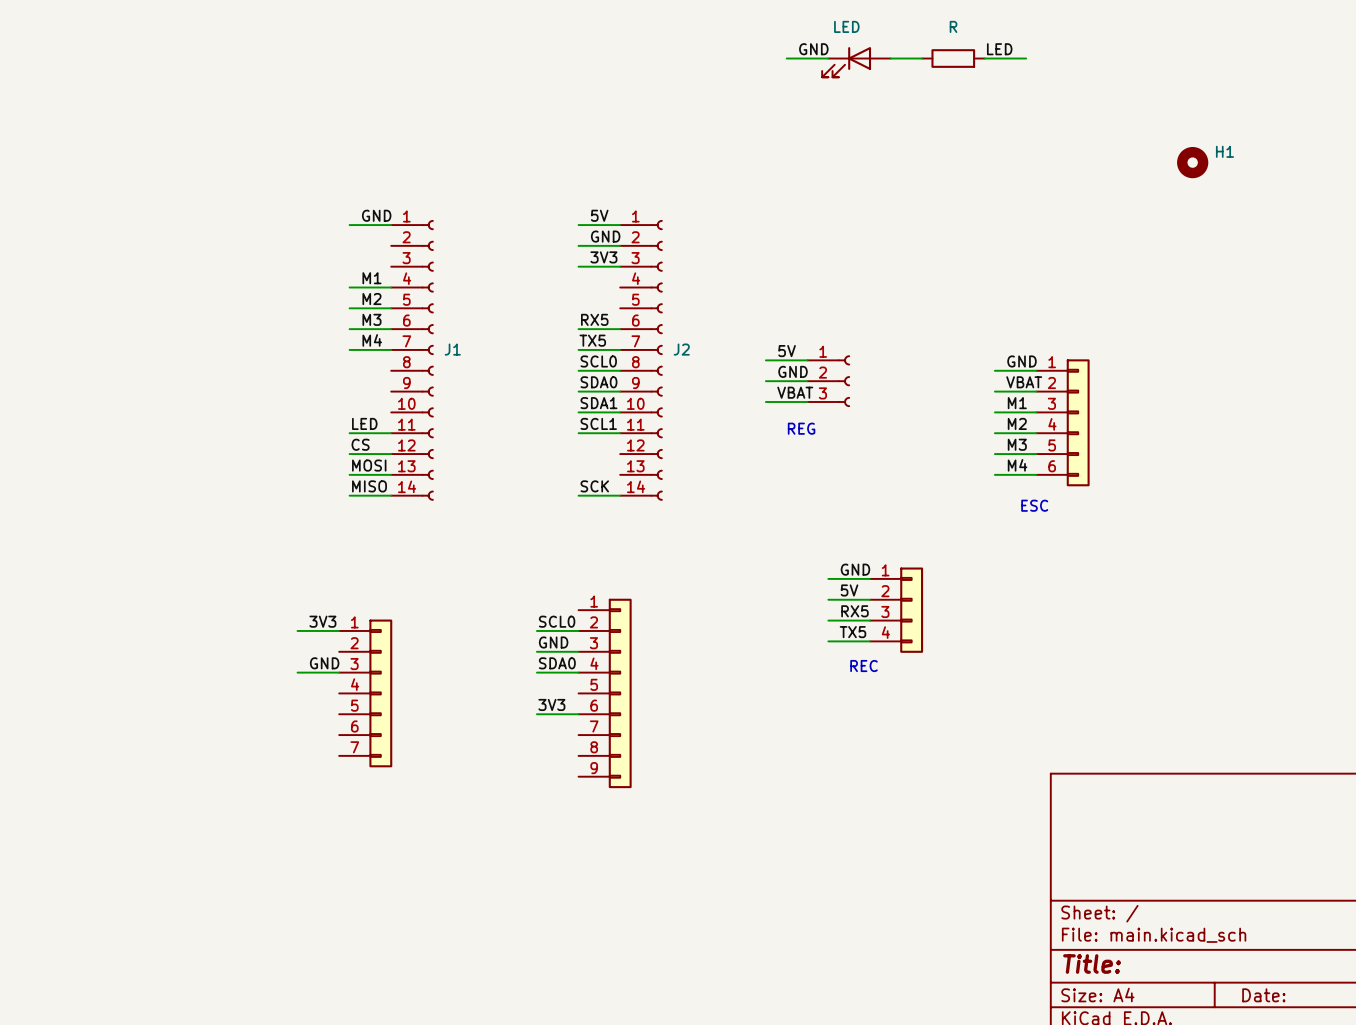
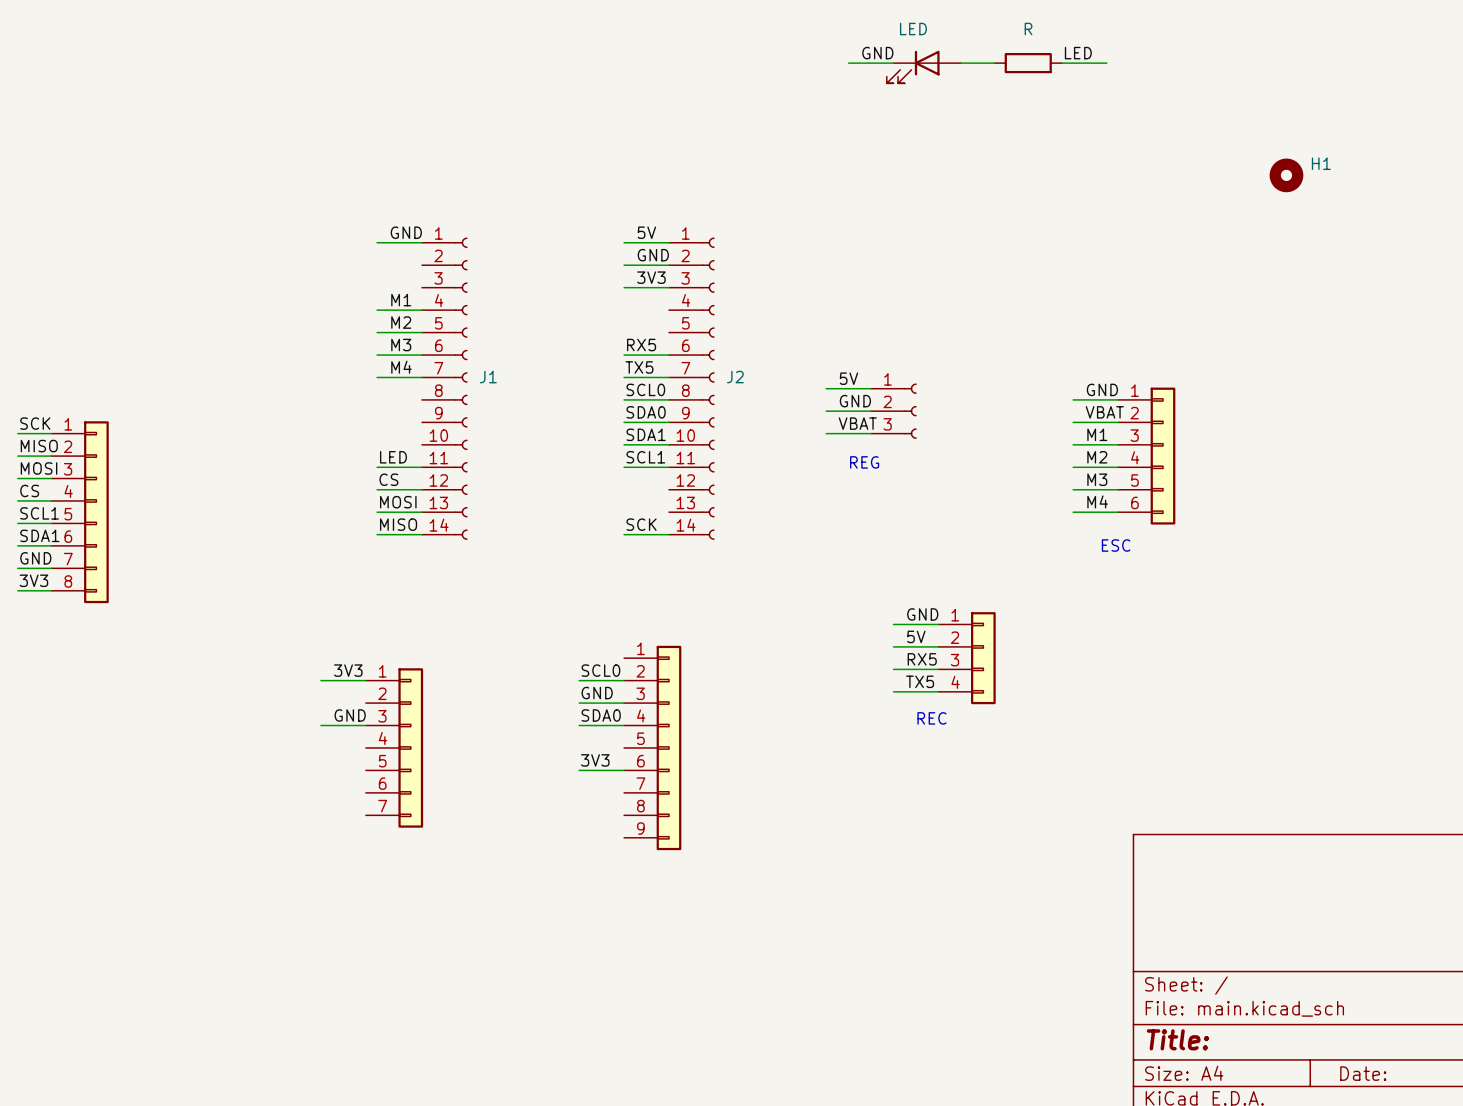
label: none -> SCK (35, 423)
wire: none -> (17, 433) (51, 433)
label: none -> MISO (39, 446)
wire: none -> (17, 456) (51, 456)
label: none -> MOSI (39, 468)
wire: none -> (17, 478) (51, 478)
label: none -> CS (29, 490)
wire: none -> (17, 500) (51, 500)
part: none -> (80, 512)
label: none -> SCL1 (39, 513)
wire: none -> (17, 523) (51, 523)
label: none -> SDA1 (39, 535)
wire: none -> (17, 545) (51, 545)
label: none -> GND (35, 558)
wire: none -> (17, 568) (51, 568)
label: none -> 3V3 (33, 580)
wire: none -> (17, 590) (51, 590)

